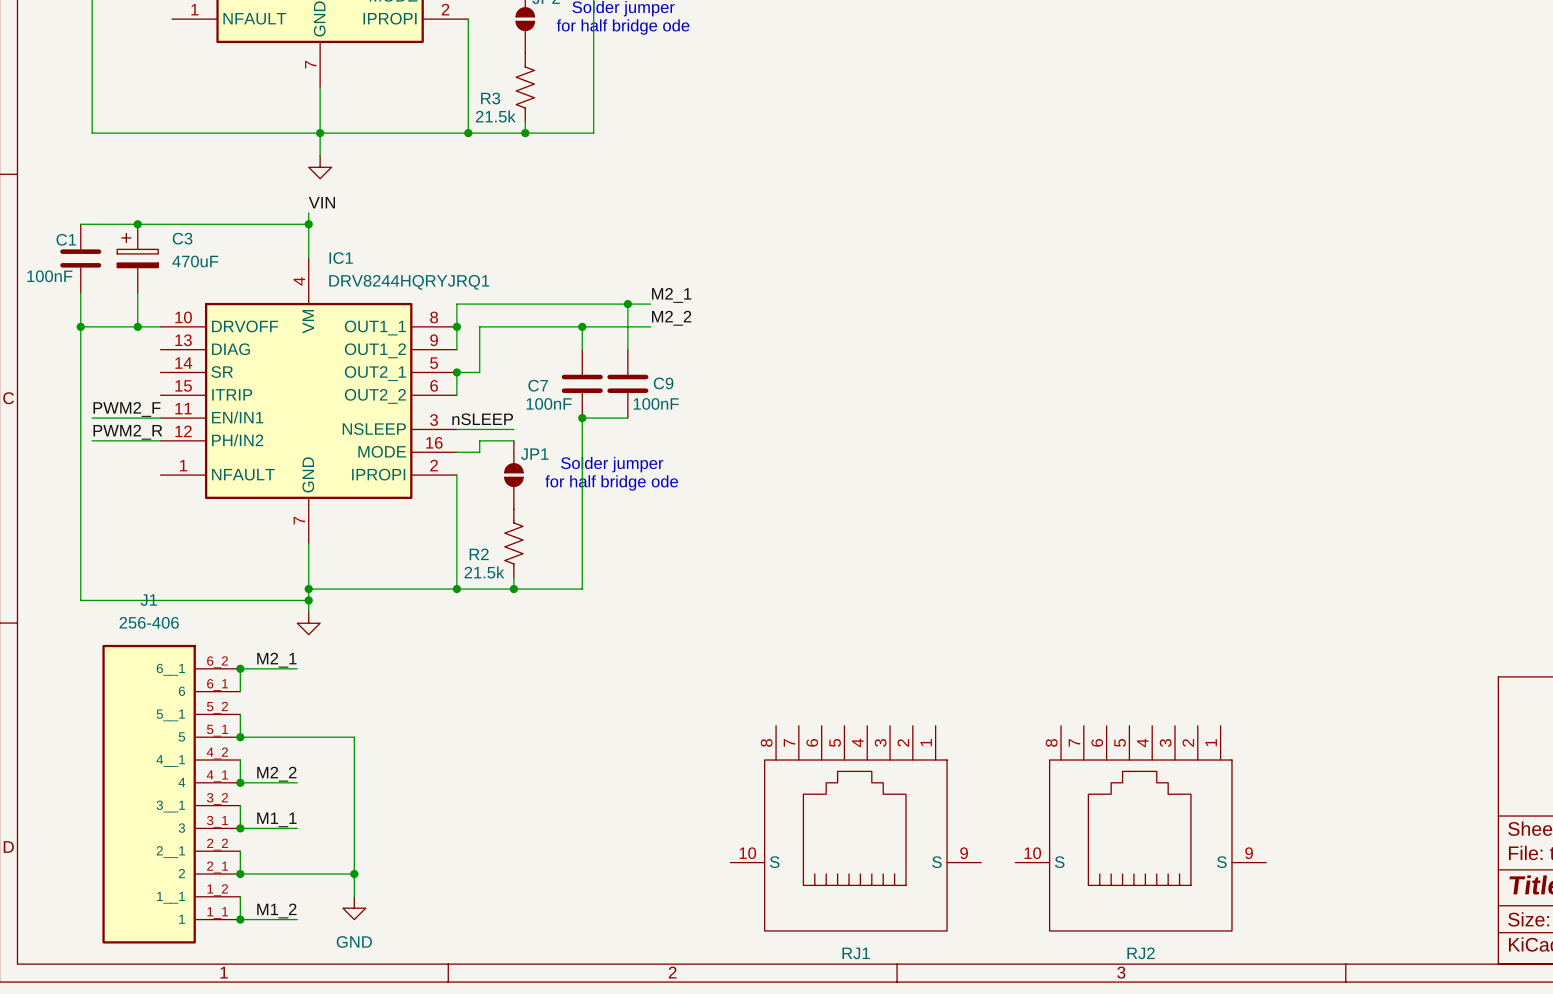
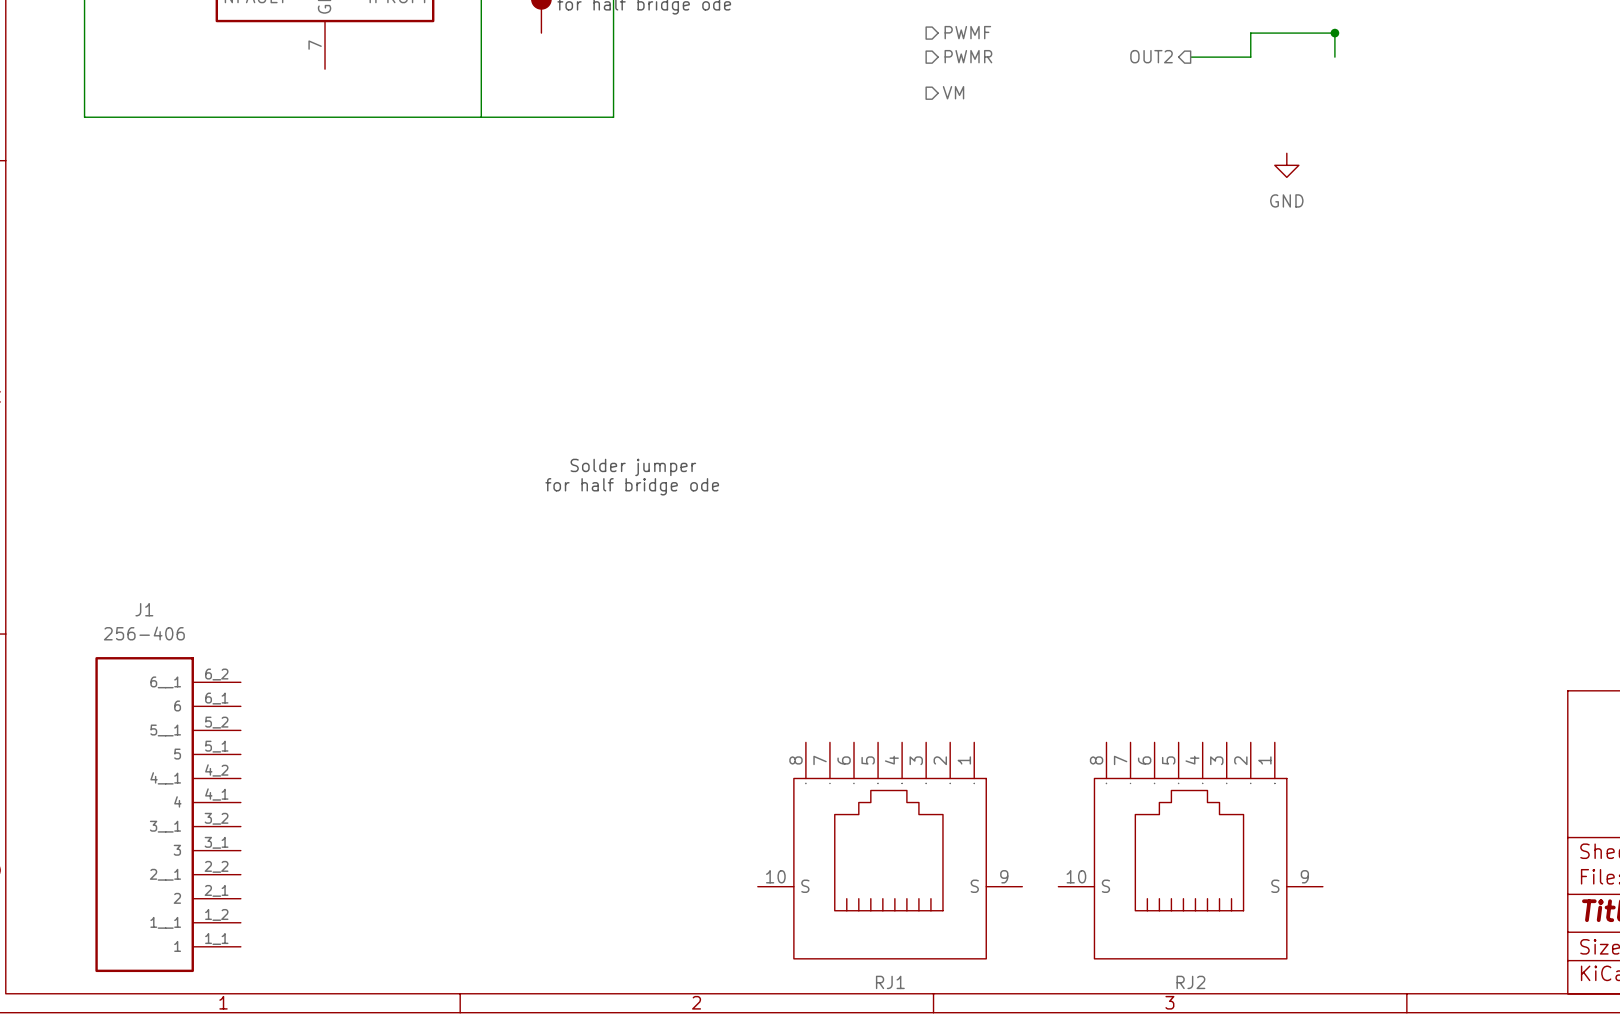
sheet pin: none -> PWMF (967, 32)
junction: none -> (1334, 33)
sheet pin: none -> PWMR (968, 56)
sheet pin: none -> OUT2 (1151, 56)
wire: none -> (1190, 57) (1250, 57) (1250, 33) (1334, 33) (1334, 57)
wire: (320, 87) (320, 155) -> none
R3: 21.5k (525, 87) -> none
sheet pin: none -> VM (953, 92)
wire: (525, 121) (525, 133) -> none
junction: (320, 133) -> none
junction: (468, 133) -> none
junction: (525, 133) -> none
power symbol: (320, 167) -> none
power symbol: none -> GND (1286, 165)
label: VIN (321, 202) -> none
wire: (308, 212) (308, 258) -> none
wire: (80, 224) (308, 224) -> none
junction: (137, 224) -> none
junction: (308, 224) -> none
C1: 100nF (80, 258) -> none
C3: 470uF (137, 258) -> none
wire: (80, 292) (80, 600) (308, 600) -> none
wire: (137, 292) (137, 326) -> none
label: M2_1 (671, 295) -> none
wire: (627, 304) (627, 349) -> none
junction: (627, 304) -> none
wire: (650, 304) (456, 304) (456, 349) -> none
label: M2_2 (671, 318) -> none
wire: (80, 326) (160, 326) -> none
junction: (80, 326) -> none
junction: (137, 326) -> none
junction: (456, 326) -> none
wire: (582, 326) (582, 349) -> none
junction: (582, 326) -> none
wire: (650, 326) (479, 326) (479, 372) (456, 372) (456, 395) -> none
junction: (456, 372) -> none
C7: 100nF (582, 383) -> none
C9: 100nF (627, 383) -> none
IC1: DRV8244HQRYJRQ1 (308, 400) -> none
label: PWM2_F (127, 409) -> none
wire: (92, 418) (160, 418) -> none
junction: (582, 418) -> none
wire: (627, 418) (582, 418) (582, 589) (308, 589) -> none
label: nSLEEP (482, 419) -> none
wire: (456, 429) (513, 429) -> none
label: PWM2_R (127, 432) -> none
wire: (92, 440) (160, 440) -> none
wire: (513, 440) (479, 440) (479, 452) (456, 452) -> none
wire: (456, 475) (456, 589) -> none
JP1: (513, 475) -> none
wire: (308, 543) (308, 611) -> none
R2: 21.5k (513, 543) -> none
wire: (513, 577) (513, 589) -> none
junction: (308, 589) -> none
junction: (456, 589) -> none
junction: (513, 589) -> none
junction: (308, 600) -> none
power symbol: (308, 623) -> none
label: M2_1 (276, 660) -> none
junction: (240, 668) -> none
wire: (297, 668) (240, 668) (240, 691) -> none
wire: (240, 714) (240, 737) (354, 737) (354, 896) -> none
junction: (240, 737) -> none
wire: (240, 760) (240, 782) (297, 782) -> none
label: M2_2 (276, 774) -> none
junction: (240, 782) -> none
wire: (240, 805) (240, 828) (297, 828) -> none
label: M1_1 (276, 819) -> none
junction: (240, 828) -> none
wire: (240, 851) (240, 874) (354, 874) -> none
junction: (240, 874) -> none
junction: (354, 874) -> none
wire: (240, 896) (240, 919) (297, 919) -> none
power symbol: GND (354, 908) -> none
label: M1_2 (276, 910) -> none
junction: (240, 919) -> none

